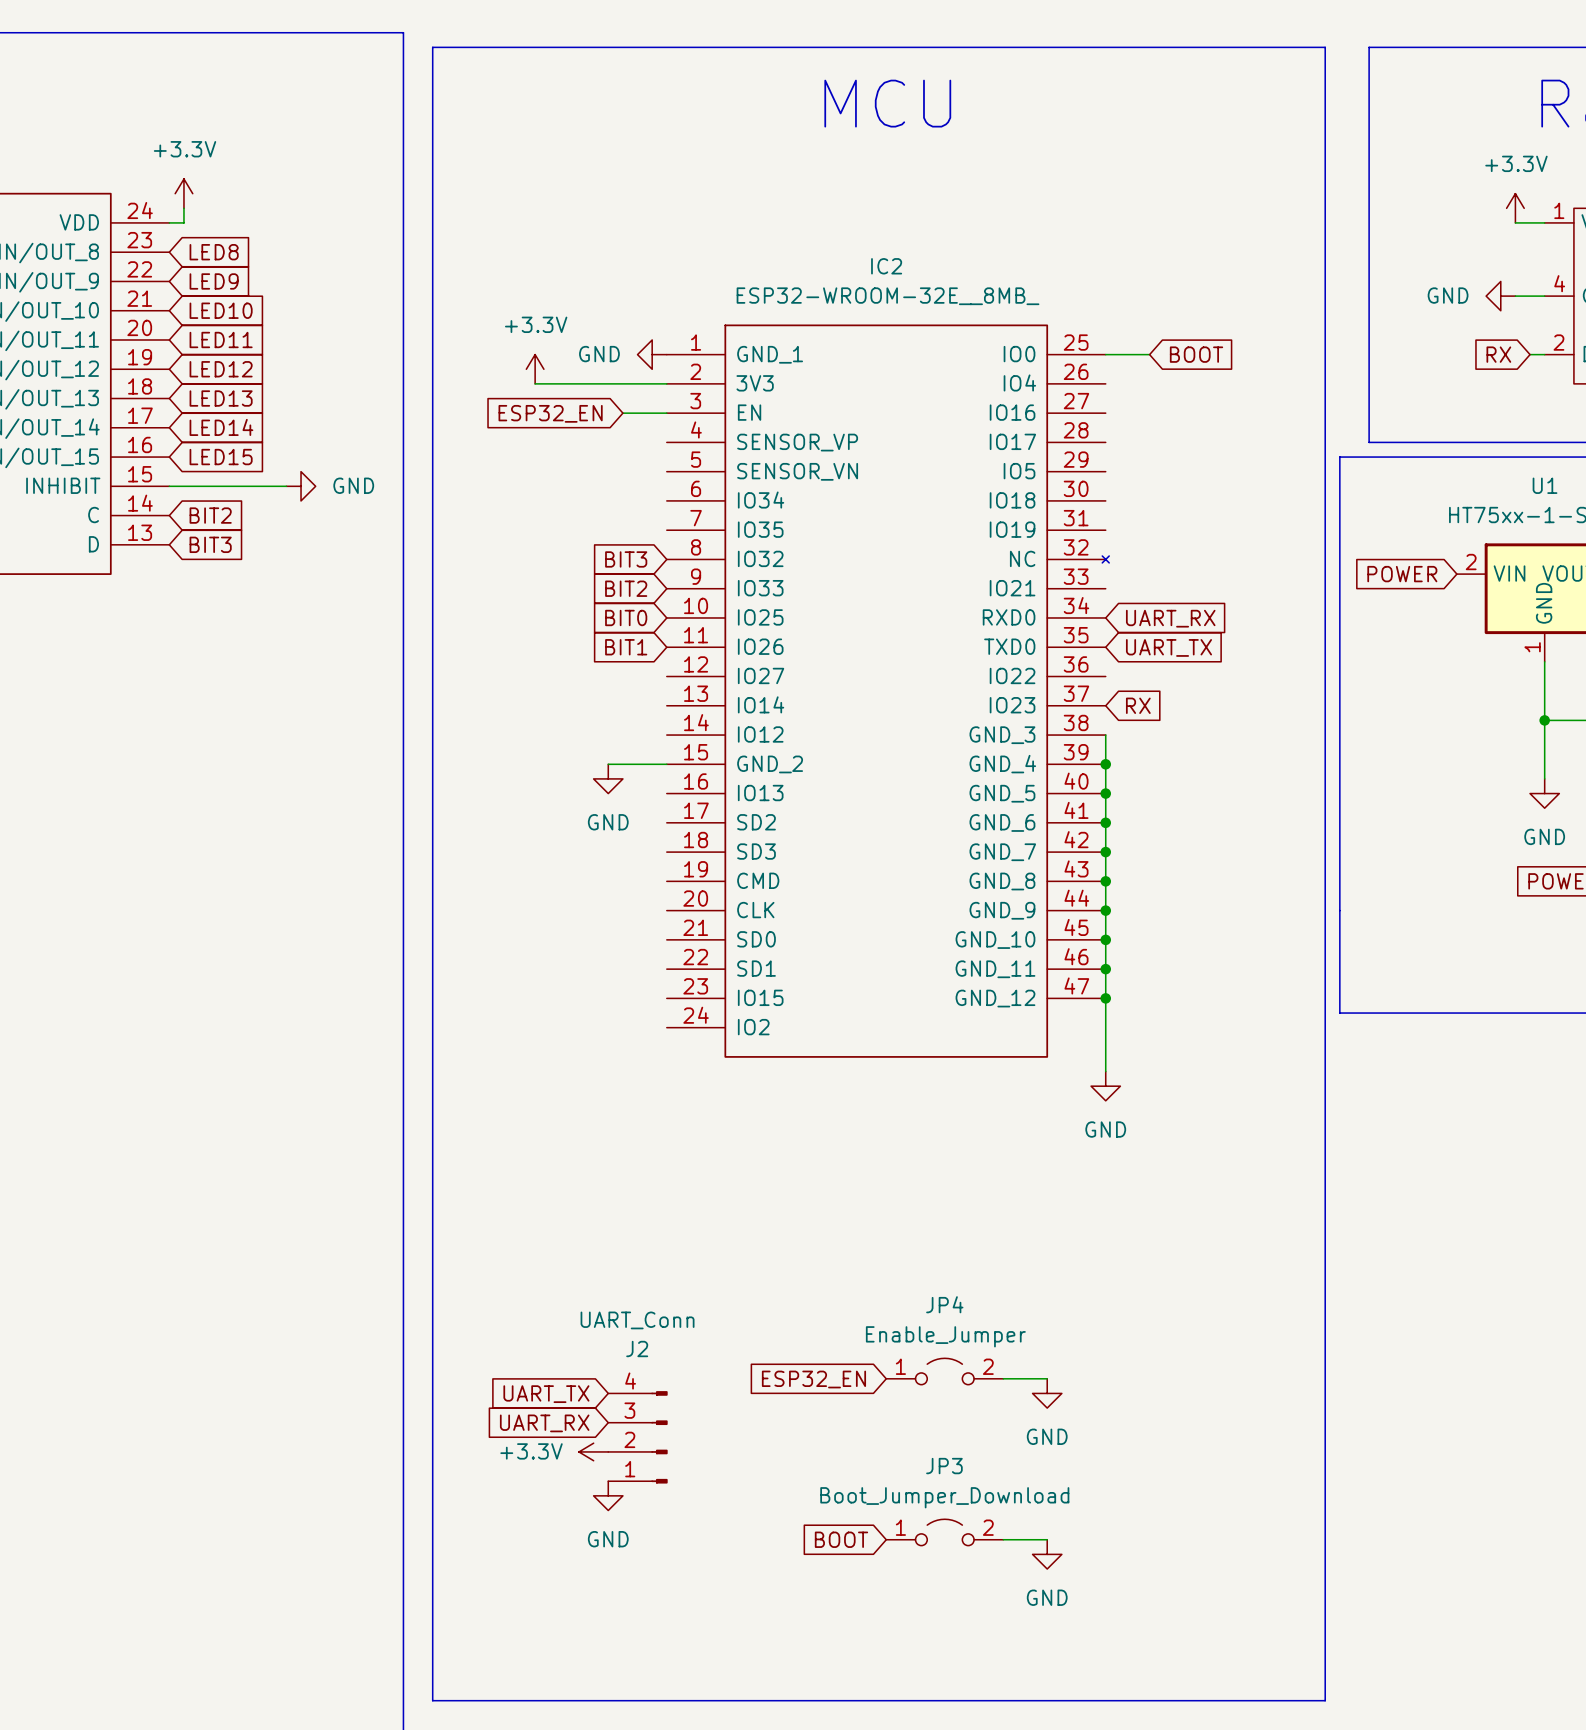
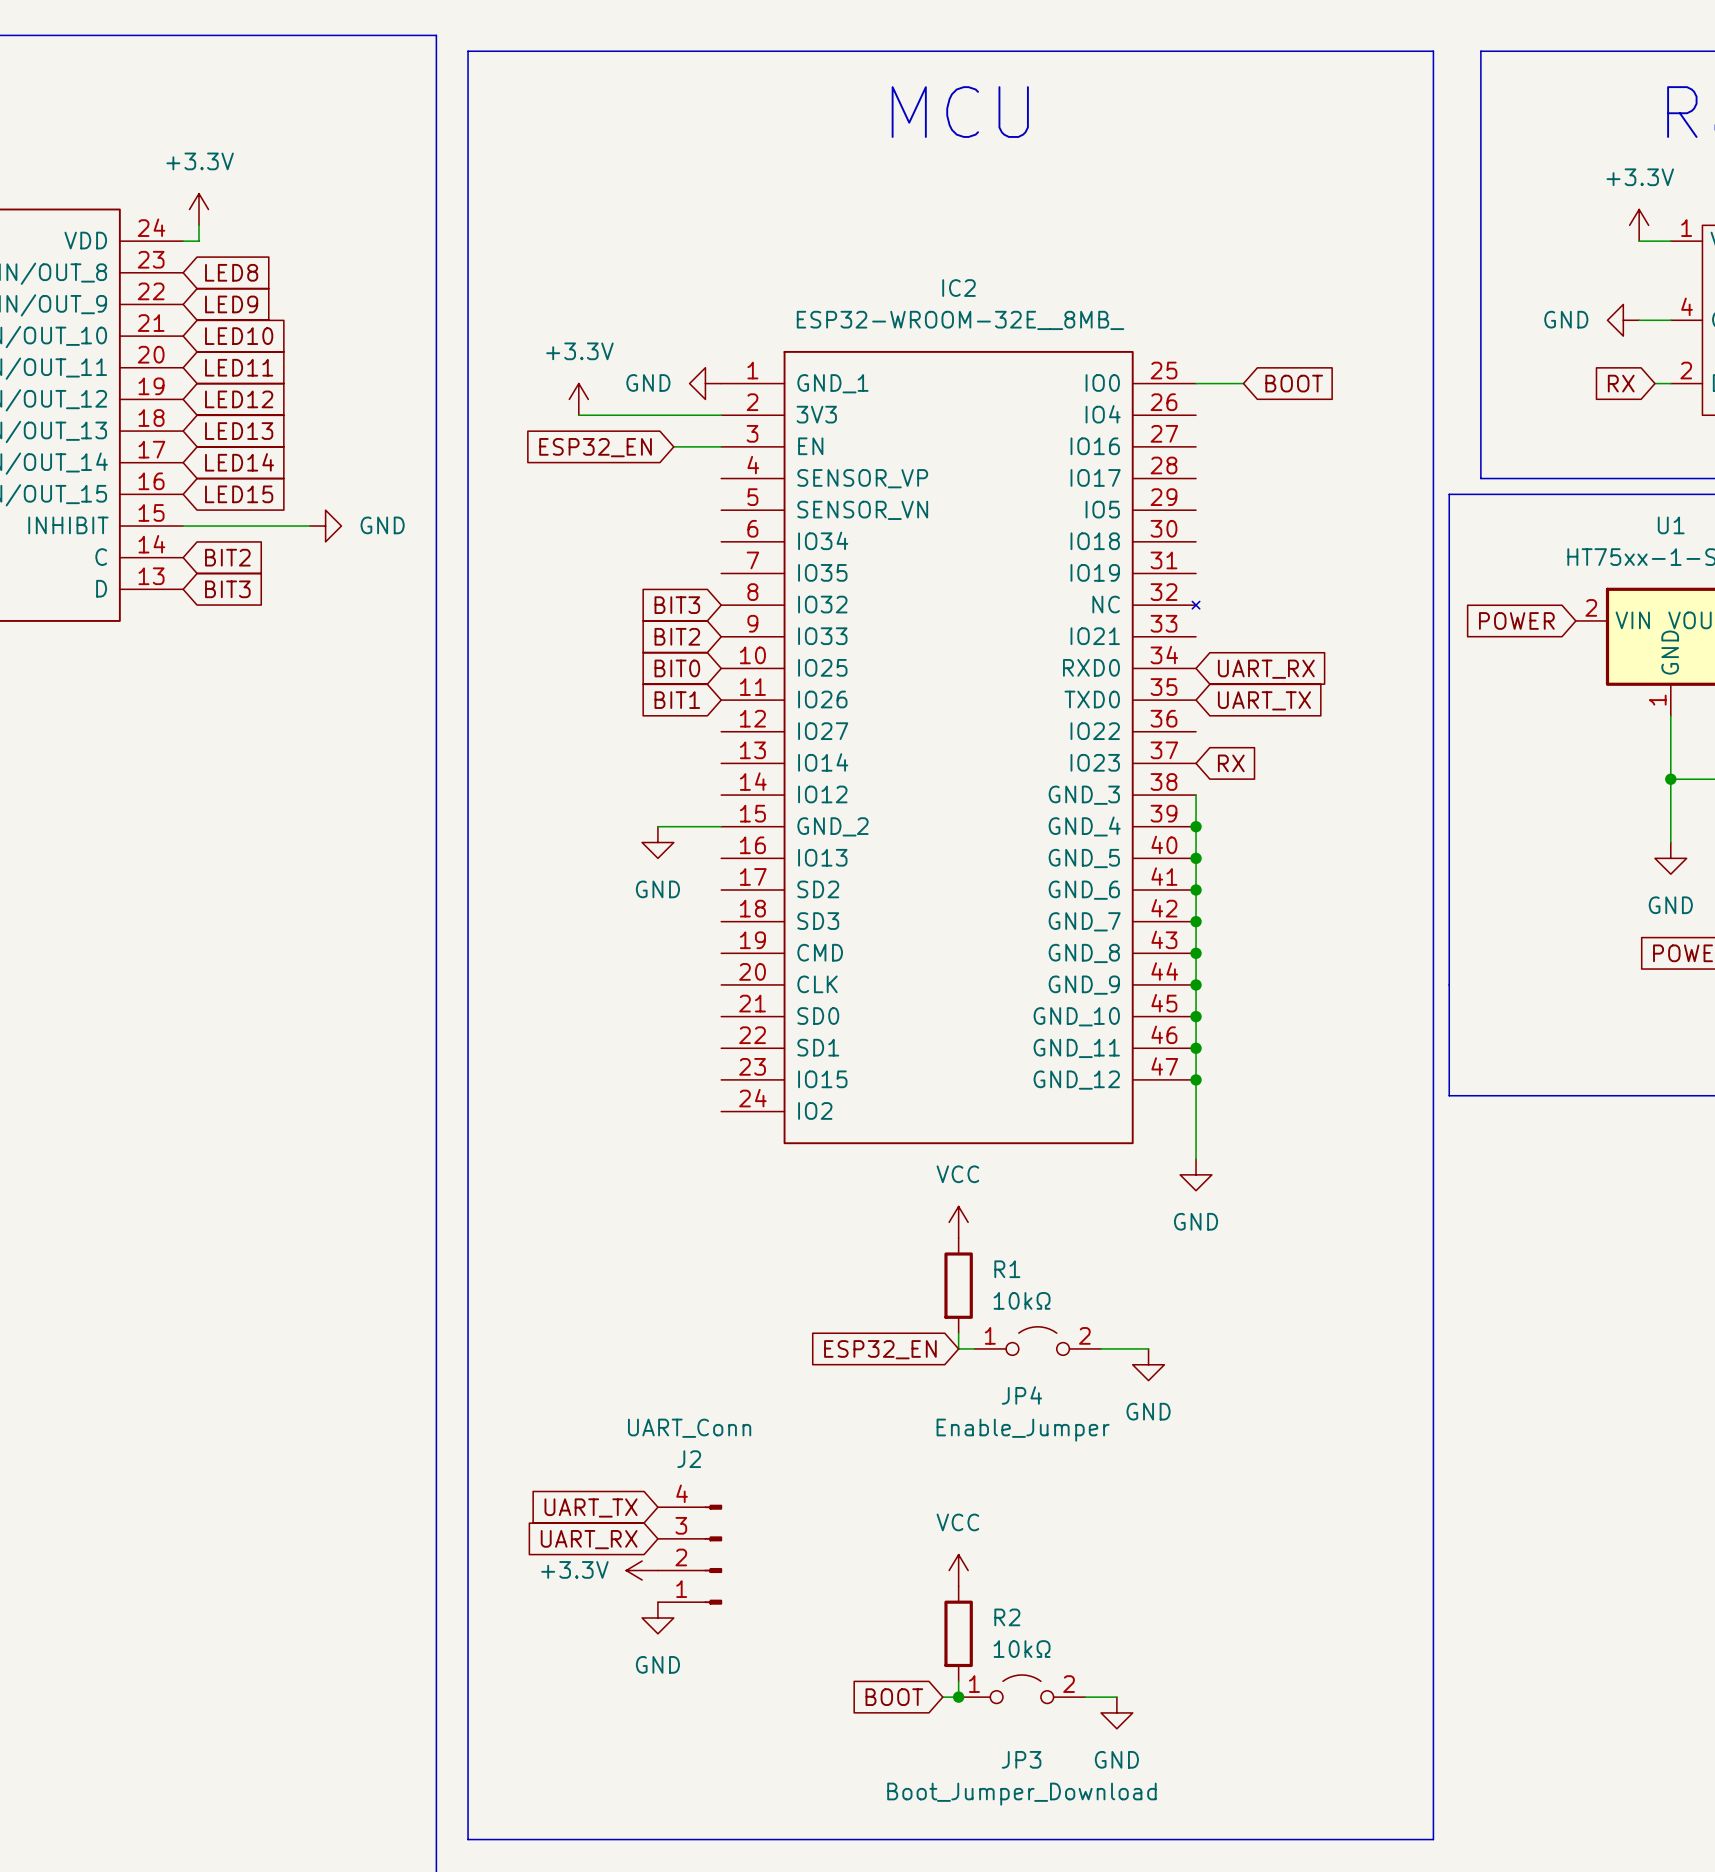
power symbol: none -> VCC (958, 1222)
R1: none -> 10kΩ (958, 1285)
wire: none -> (958, 1333) (958, 1348) (974, 1348)
power symbol: none -> GND (1148, 1364)
JP4 name position: JP4 (944, 1304) -> JP4 (1021, 1395)
JP4 value position: Enable_Jumper (945, 1336) -> Enable_Jumper (1023, 1430)
JP4 position: (944, 1371) -> (1037, 1341)
wire: (1003, 1378) (1047, 1378) -> (1101, 1348) (1148, 1348)
global label position: ESP32_EN (813, 1379) -> ESP32_EN (880, 1349)
power symbol: GND (1047, 1393) -> none
power symbol: none -> VCC (958, 1570)
JP3 name position: JP3 (944, 1466) -> JP3 (1021, 1759)
JP3 value position: Boot_Jumper_Download (944, 1497) -> Boot_Jumper_Download (1021, 1794)
R2: none -> 10kΩ (958, 1633)
JP3 position: (944, 1532) -> (1021, 1689)
global label position: BOOT (841, 1539) -> BOOT (894, 1697)
wire: (1003, 1539) (1047, 1539) -> none
wire: none -> (958, 1681) (958, 1697) (942, 1697)
power symbol position: GND (1047, 1554) -> GND (1116, 1712)
junction: none -> (958, 1697)
wire: none -> (1085, 1697) (1116, 1697)

